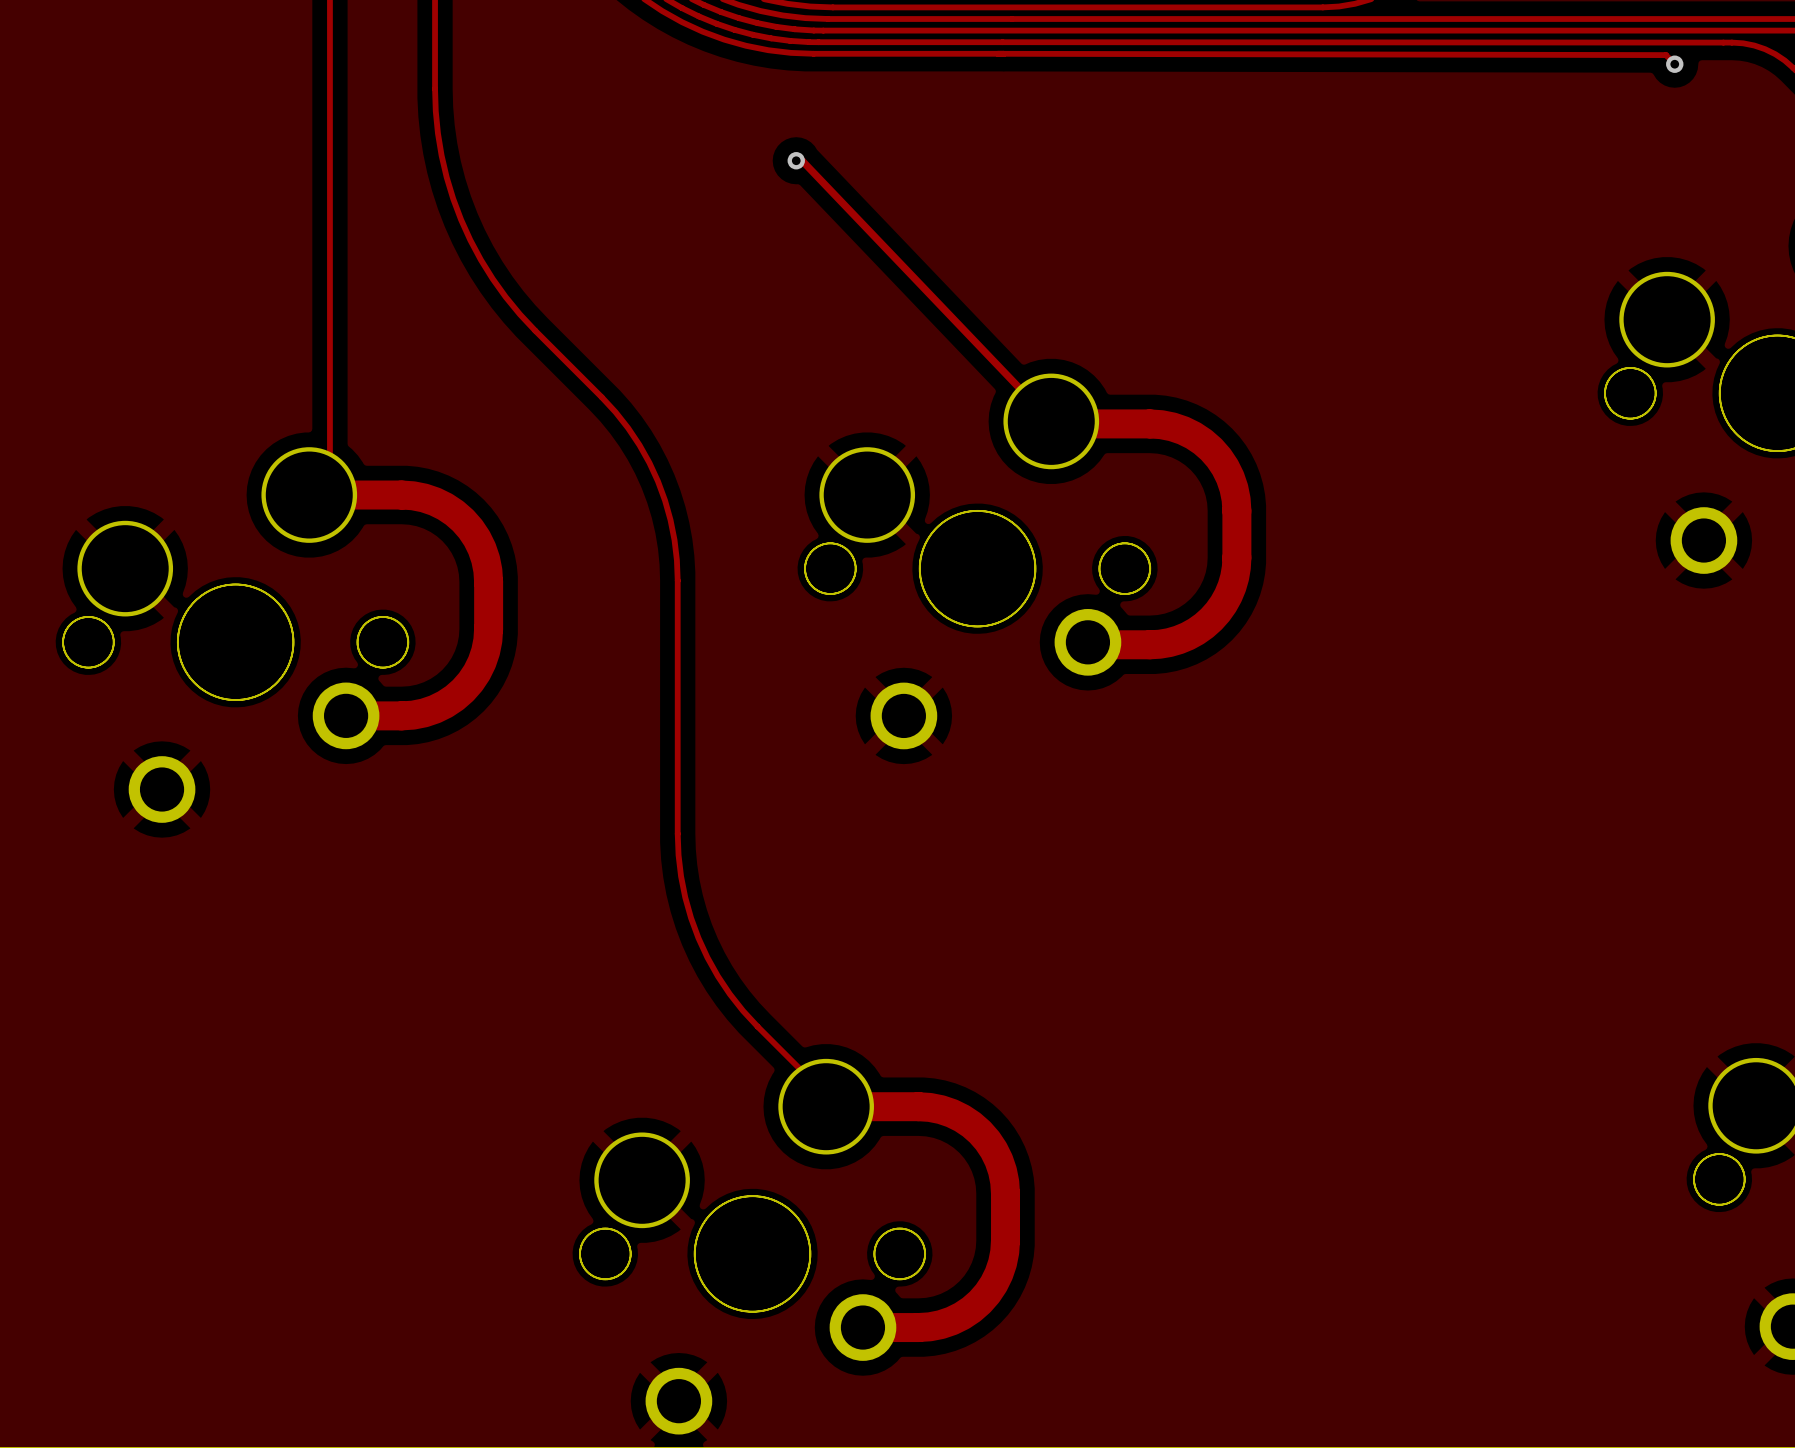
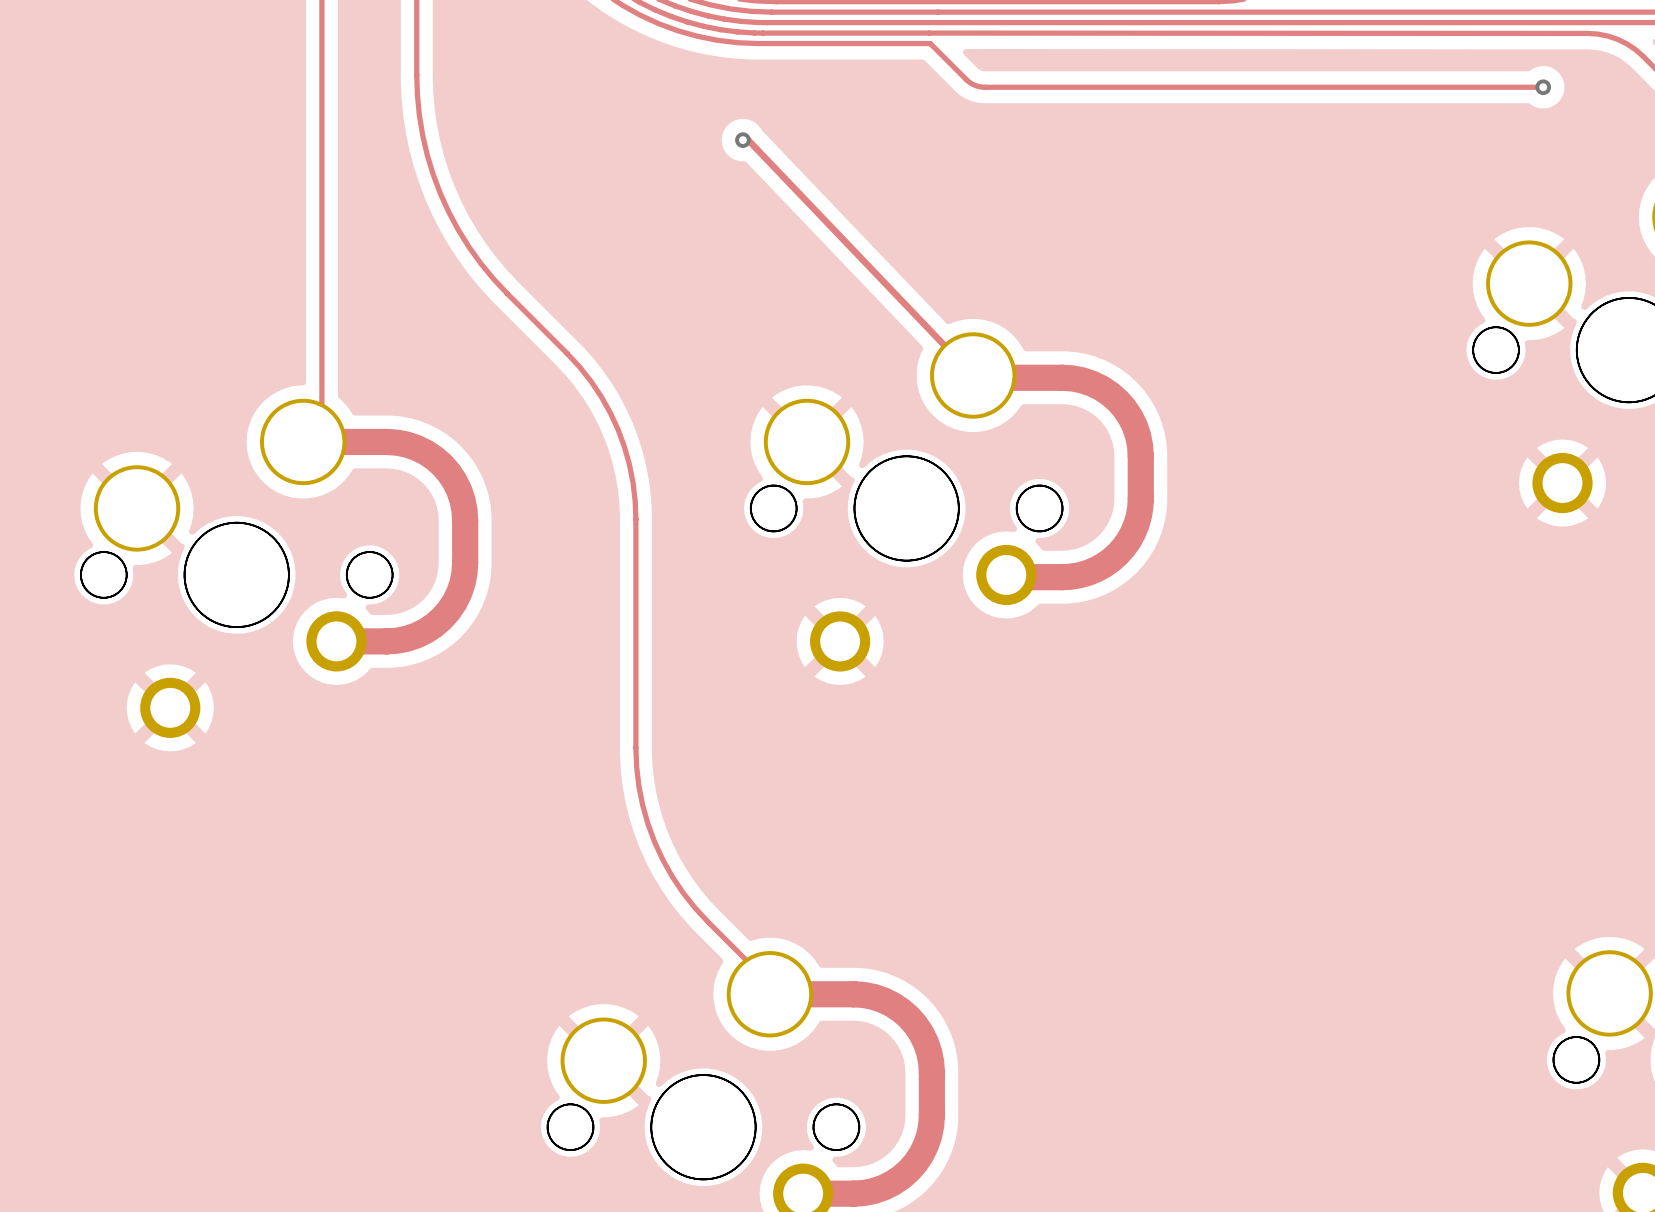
track: (997, 53) (1665, 55) (1675, 64) -> none
track: none -> (930, 43) (968, 81) (982, 87) (1543, 87)
via position: (1674, 64) -> (1543, 87)

